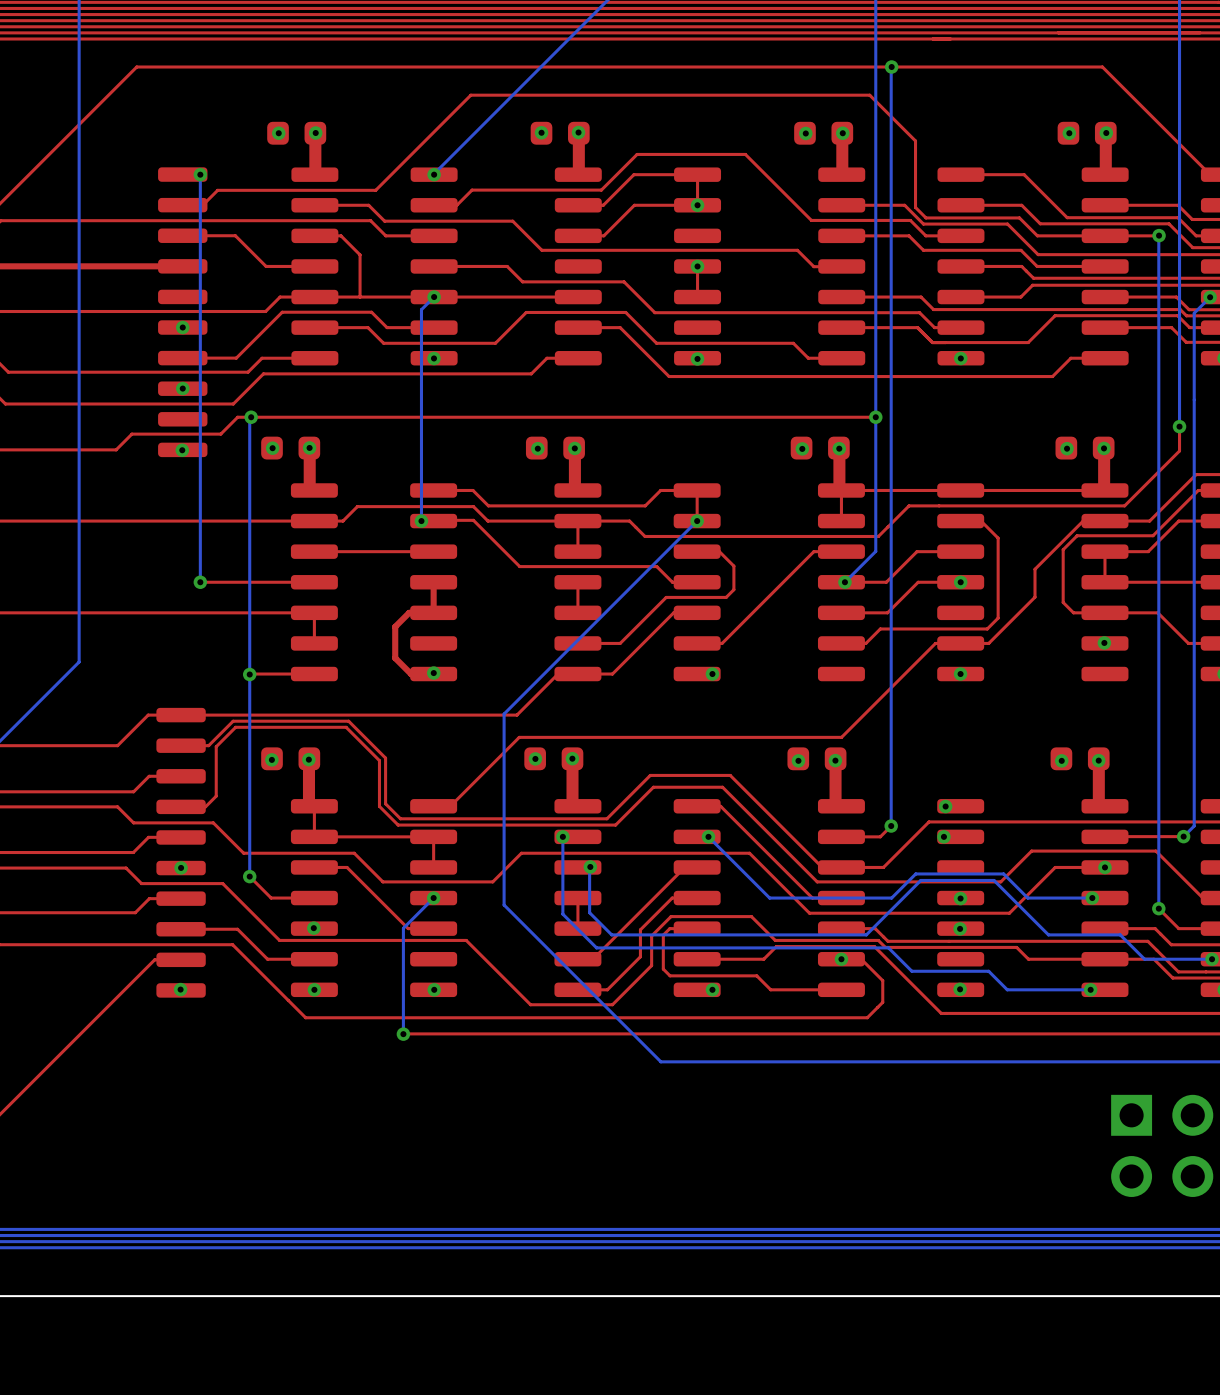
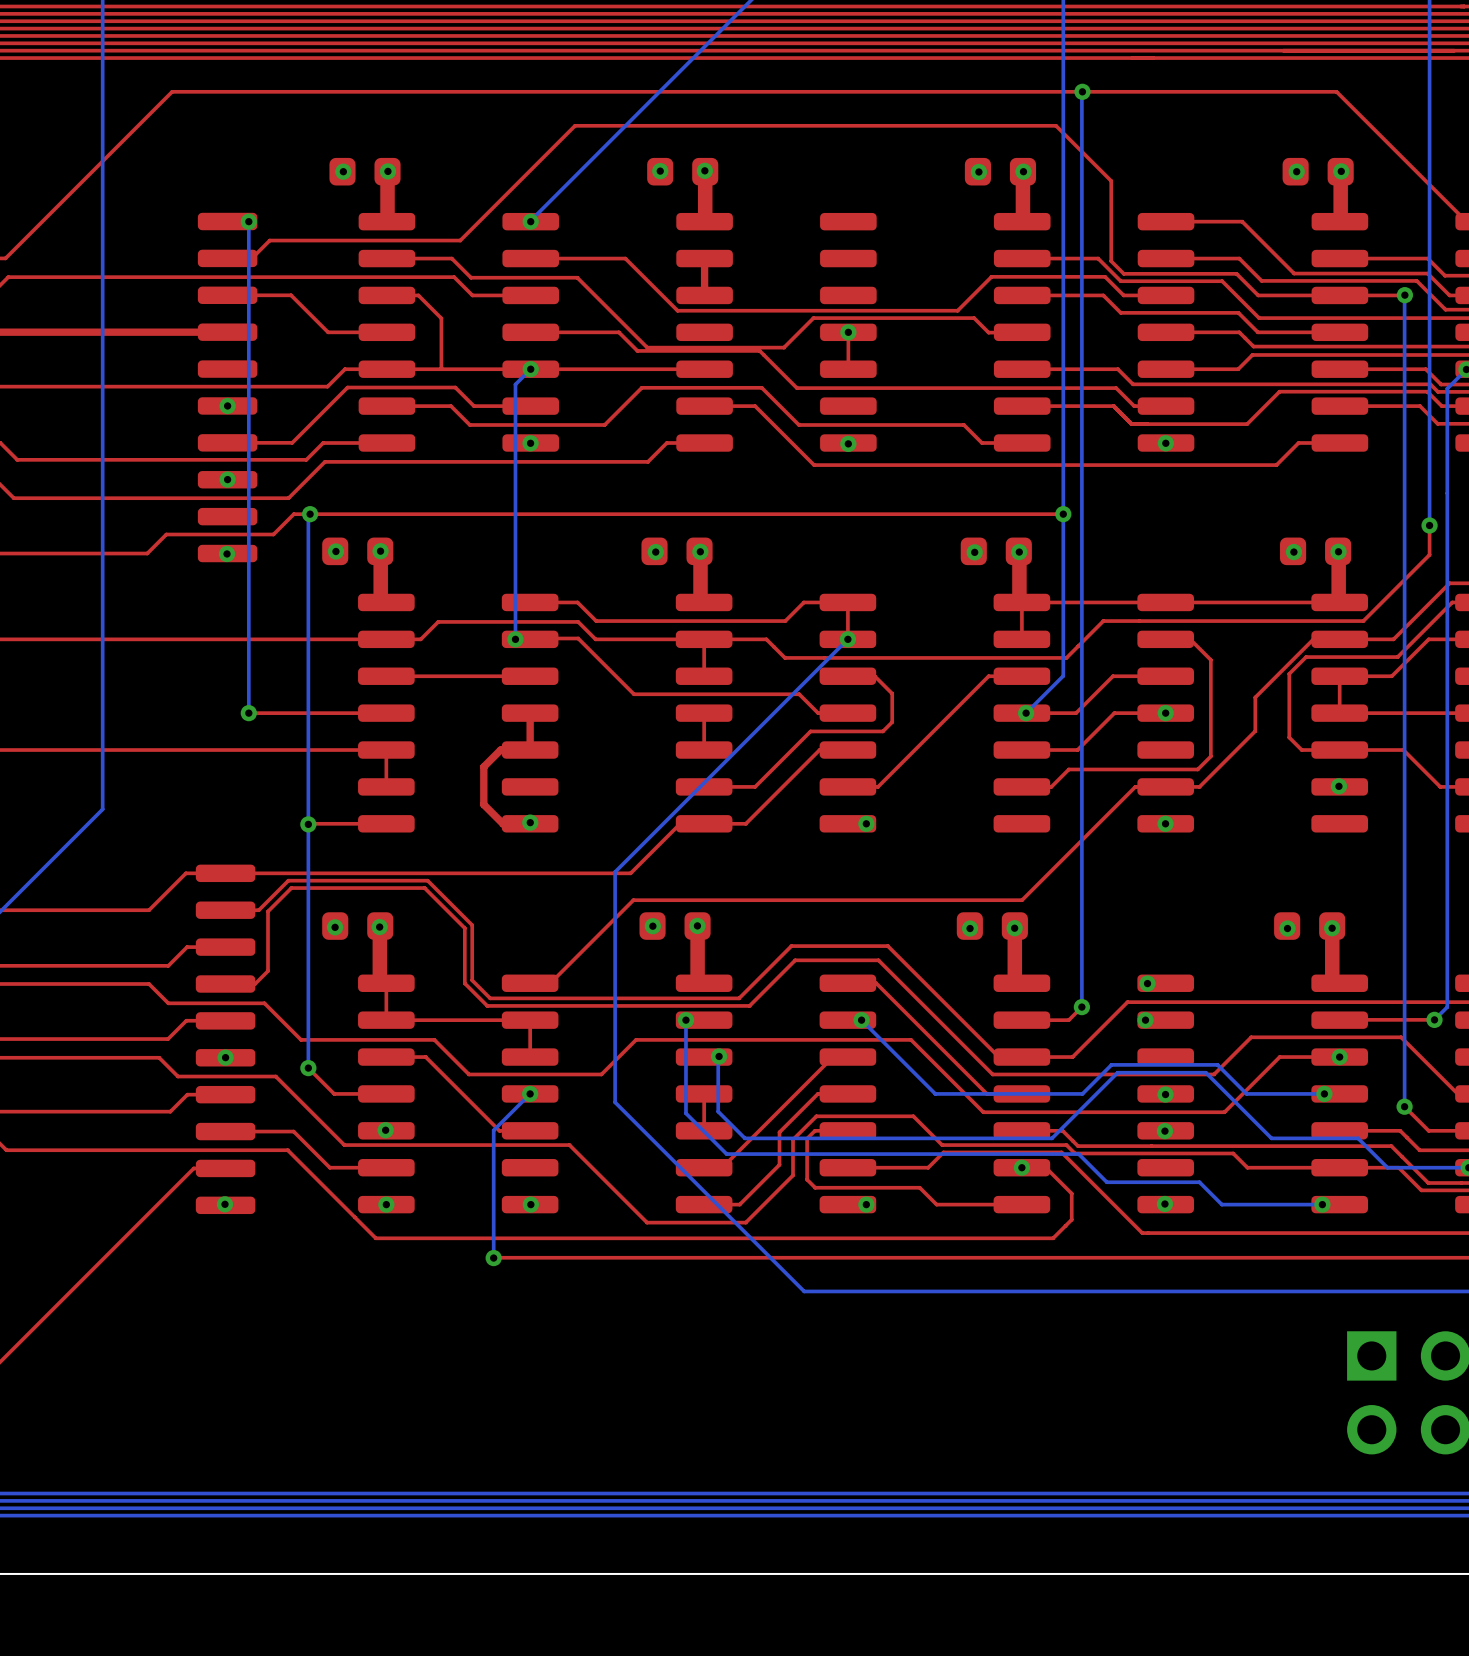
top track: (456, 205) (472, 190) (601, 190) (637, 154) (745, 154) (811, 220) (816, 220) -> (558, 258) (625, 258) (677, 310) (957, 310) (991, 276)
top track: (578, 205) (603, 205) (633, 174) (697, 174) (697, 205) (634, 205) (603, 235) (578, 235) -> (704, 258) (704, 295)
via: (697, 205) -> none
top track: (472, 221) (512, 221) (541, 250) (797, 250) (801, 254) -> (577, 277) (647, 347) (783, 347) (813, 318) (974, 318)

